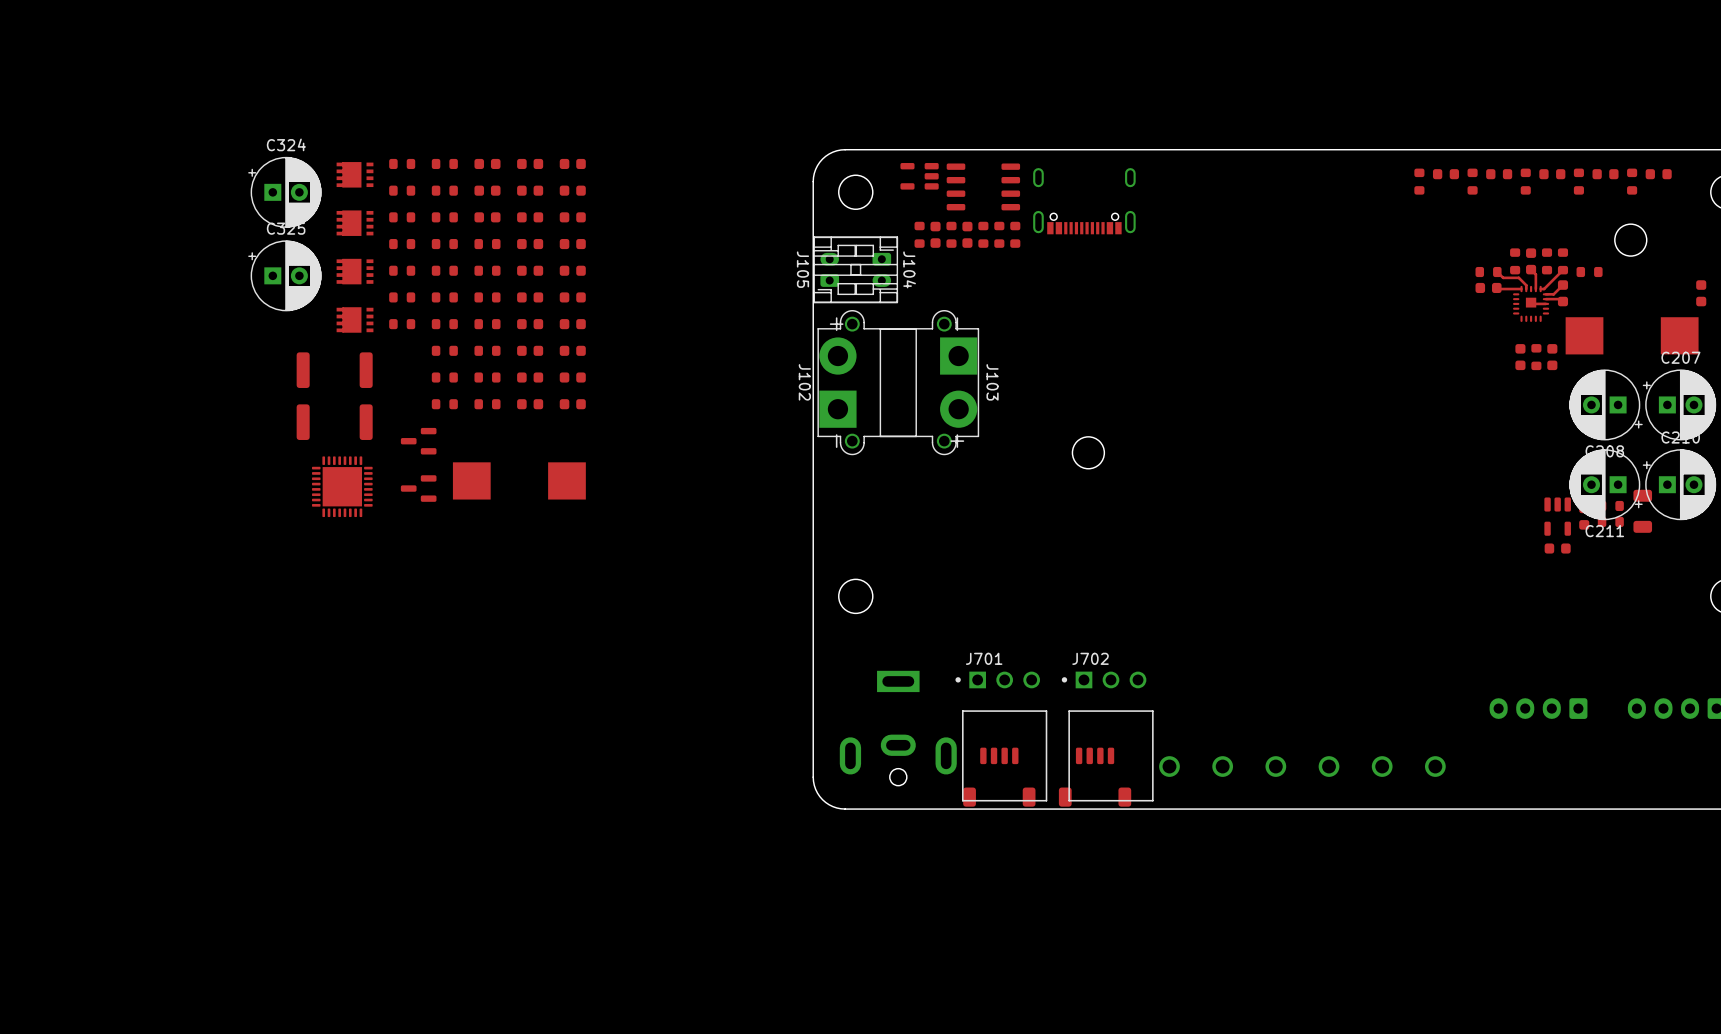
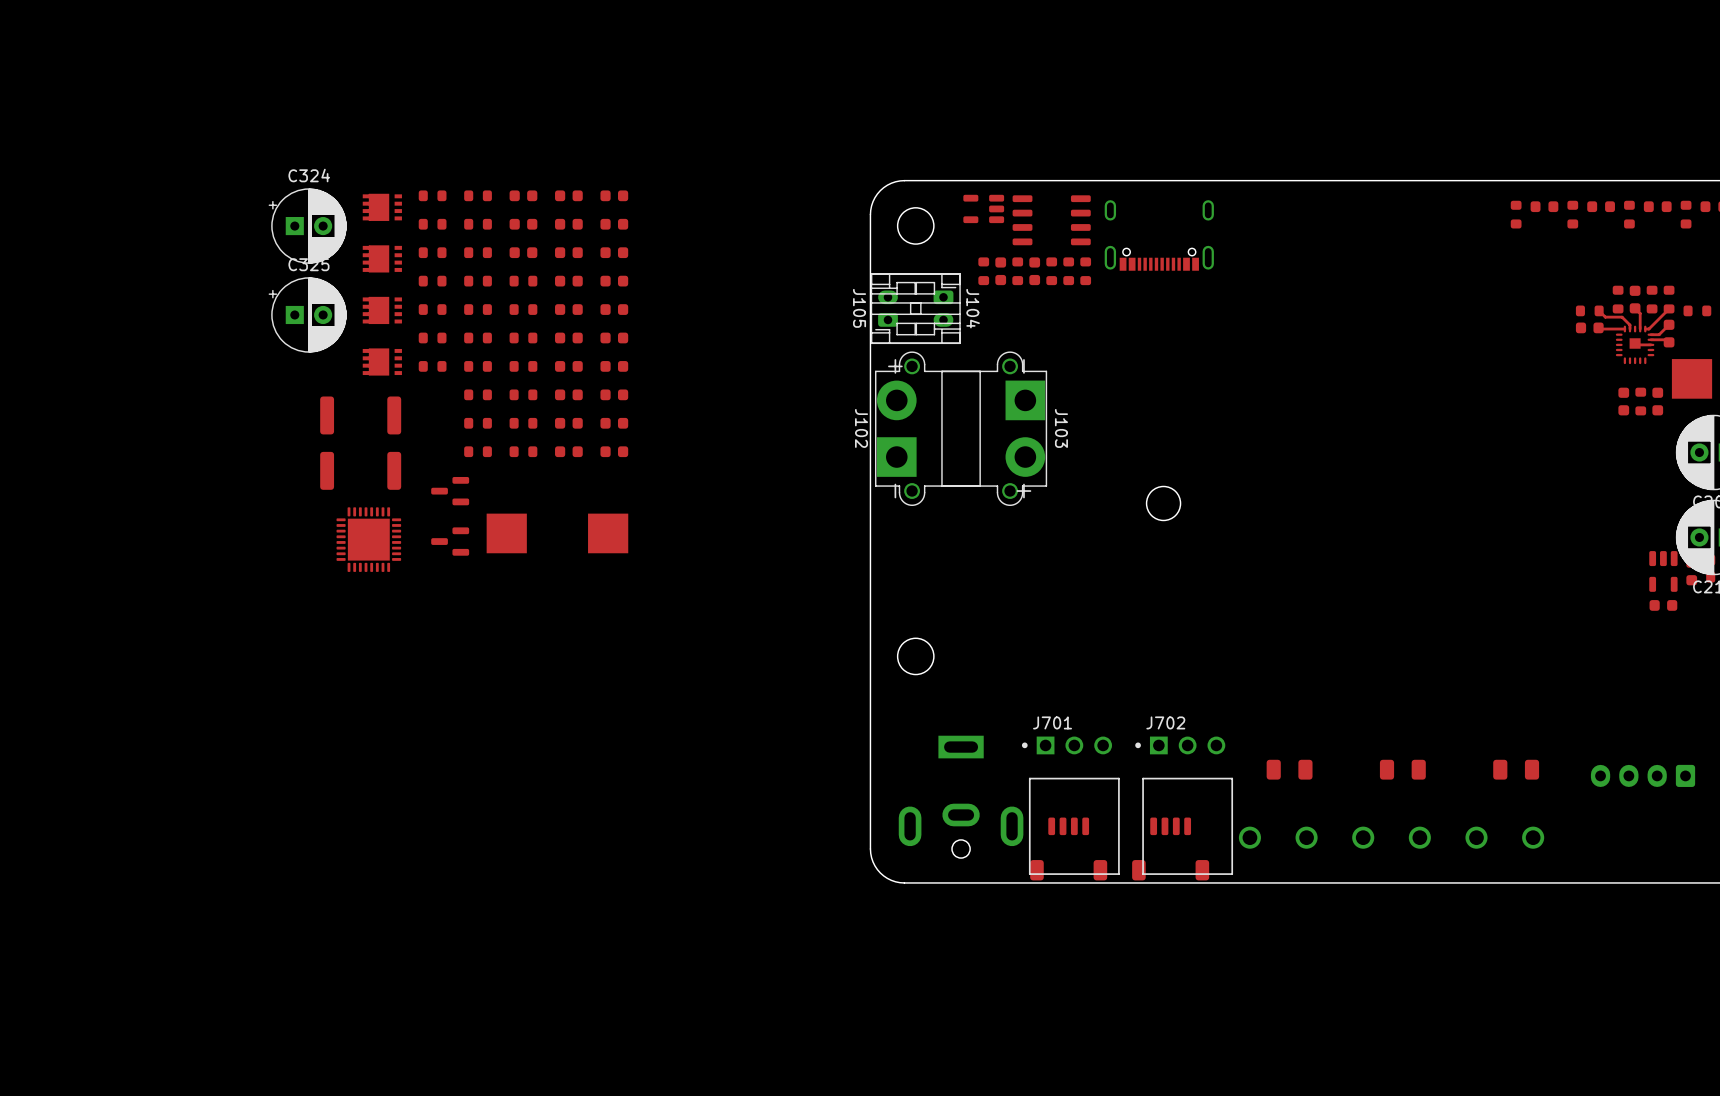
part: none -> (1289, 769)
part: none -> (1402, 769)
part: none -> (1516, 769)

